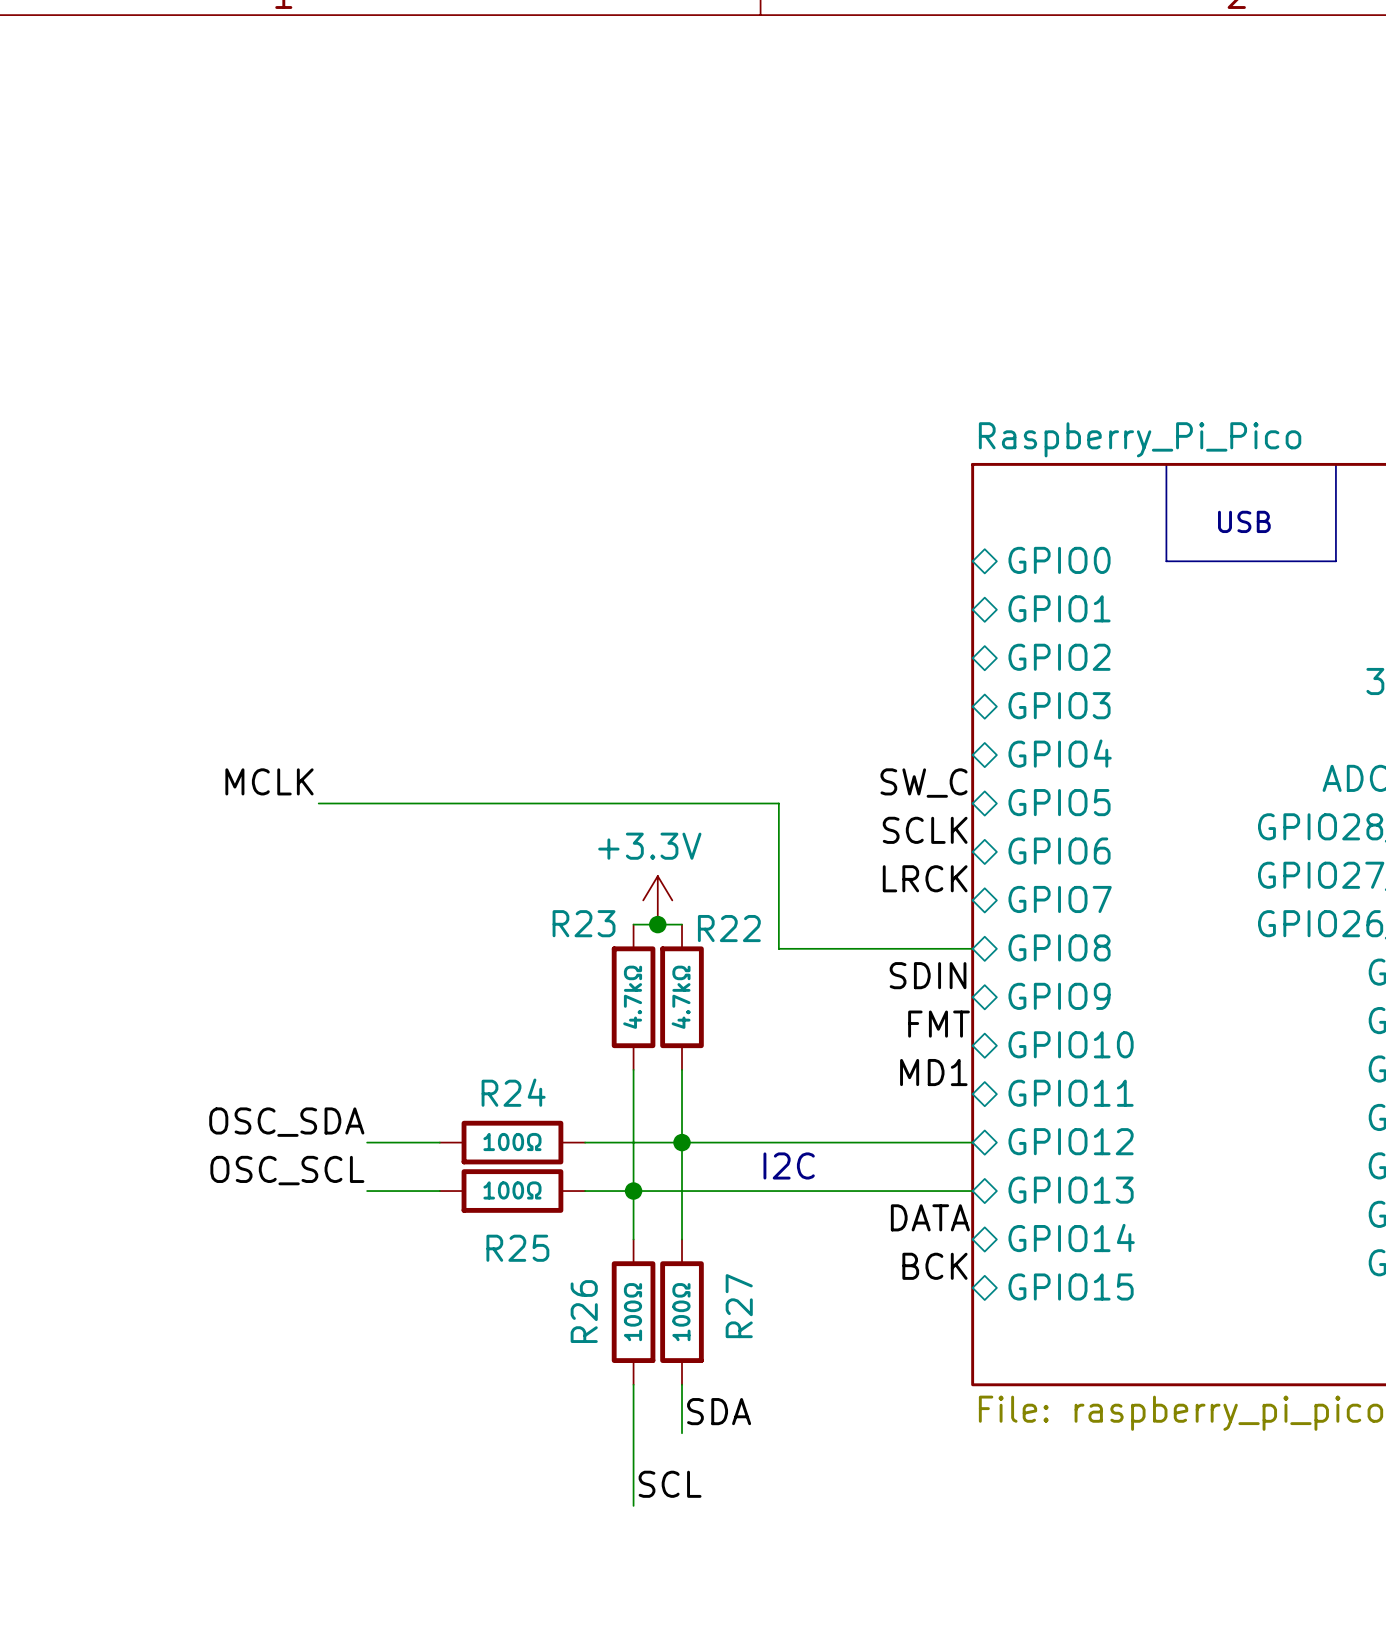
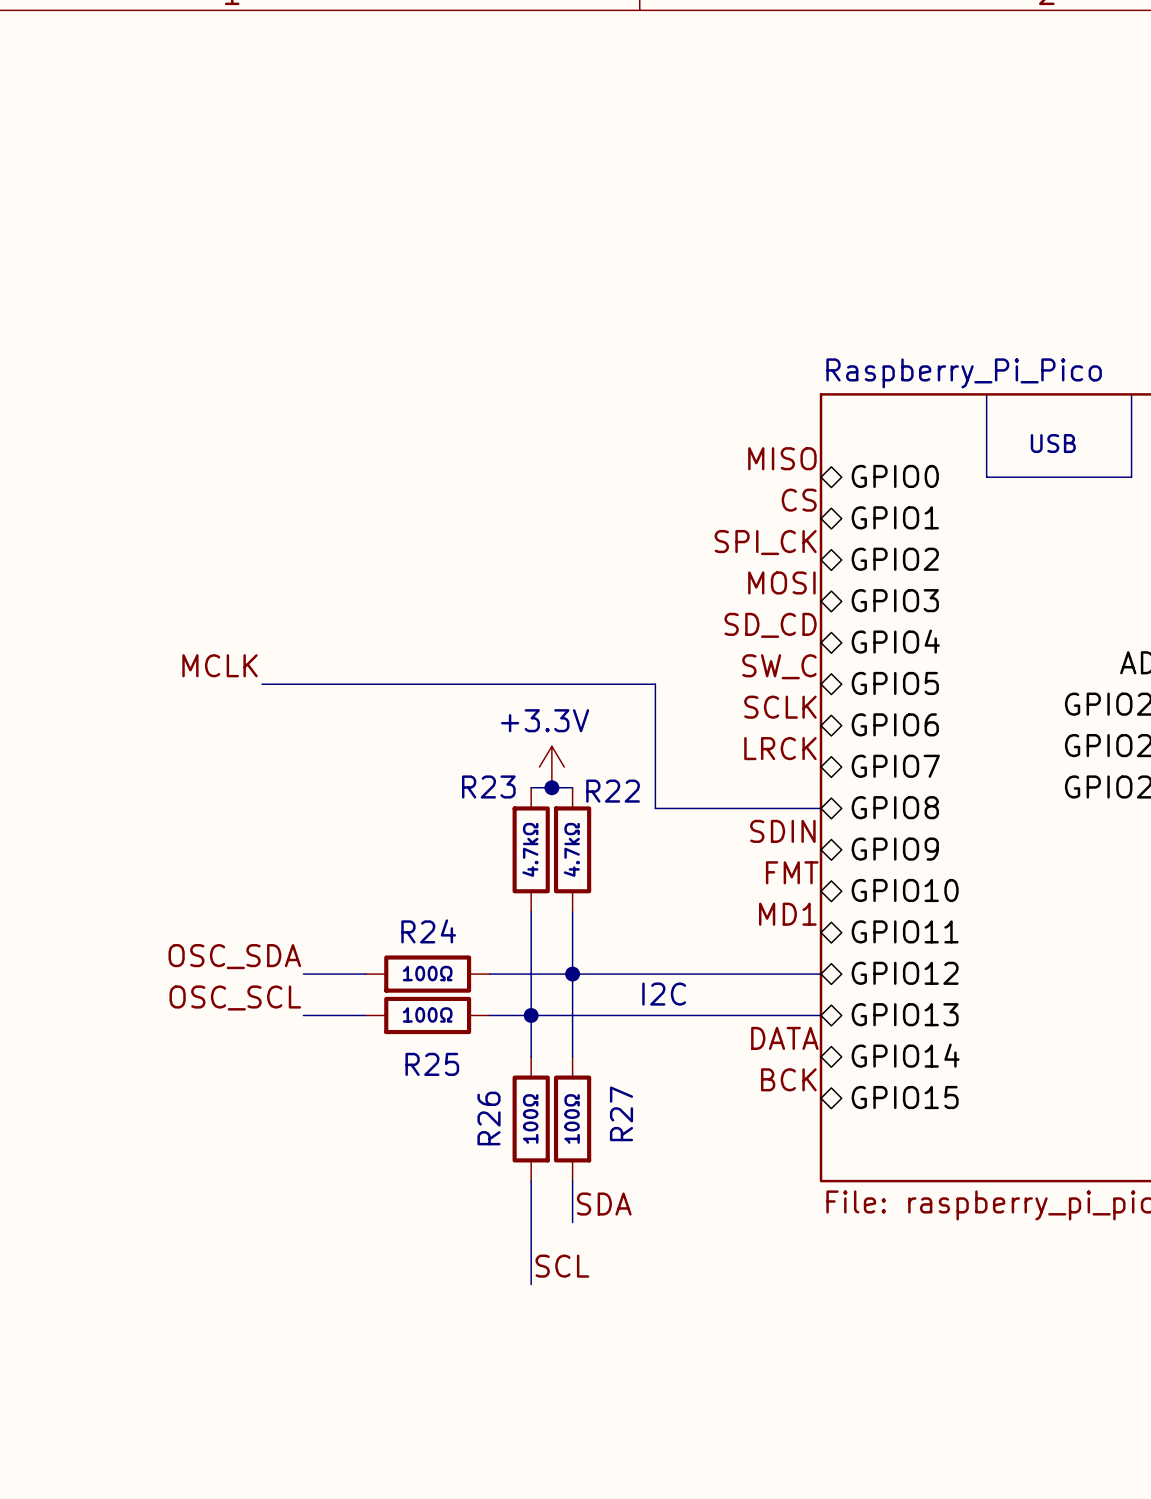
label: none -> MISO (782, 458)
label: none -> CS (799, 500)
label: none -> SPI_CK (765, 542)
label: none -> MOSI (781, 582)
label: none -> SD_CD (770, 625)

